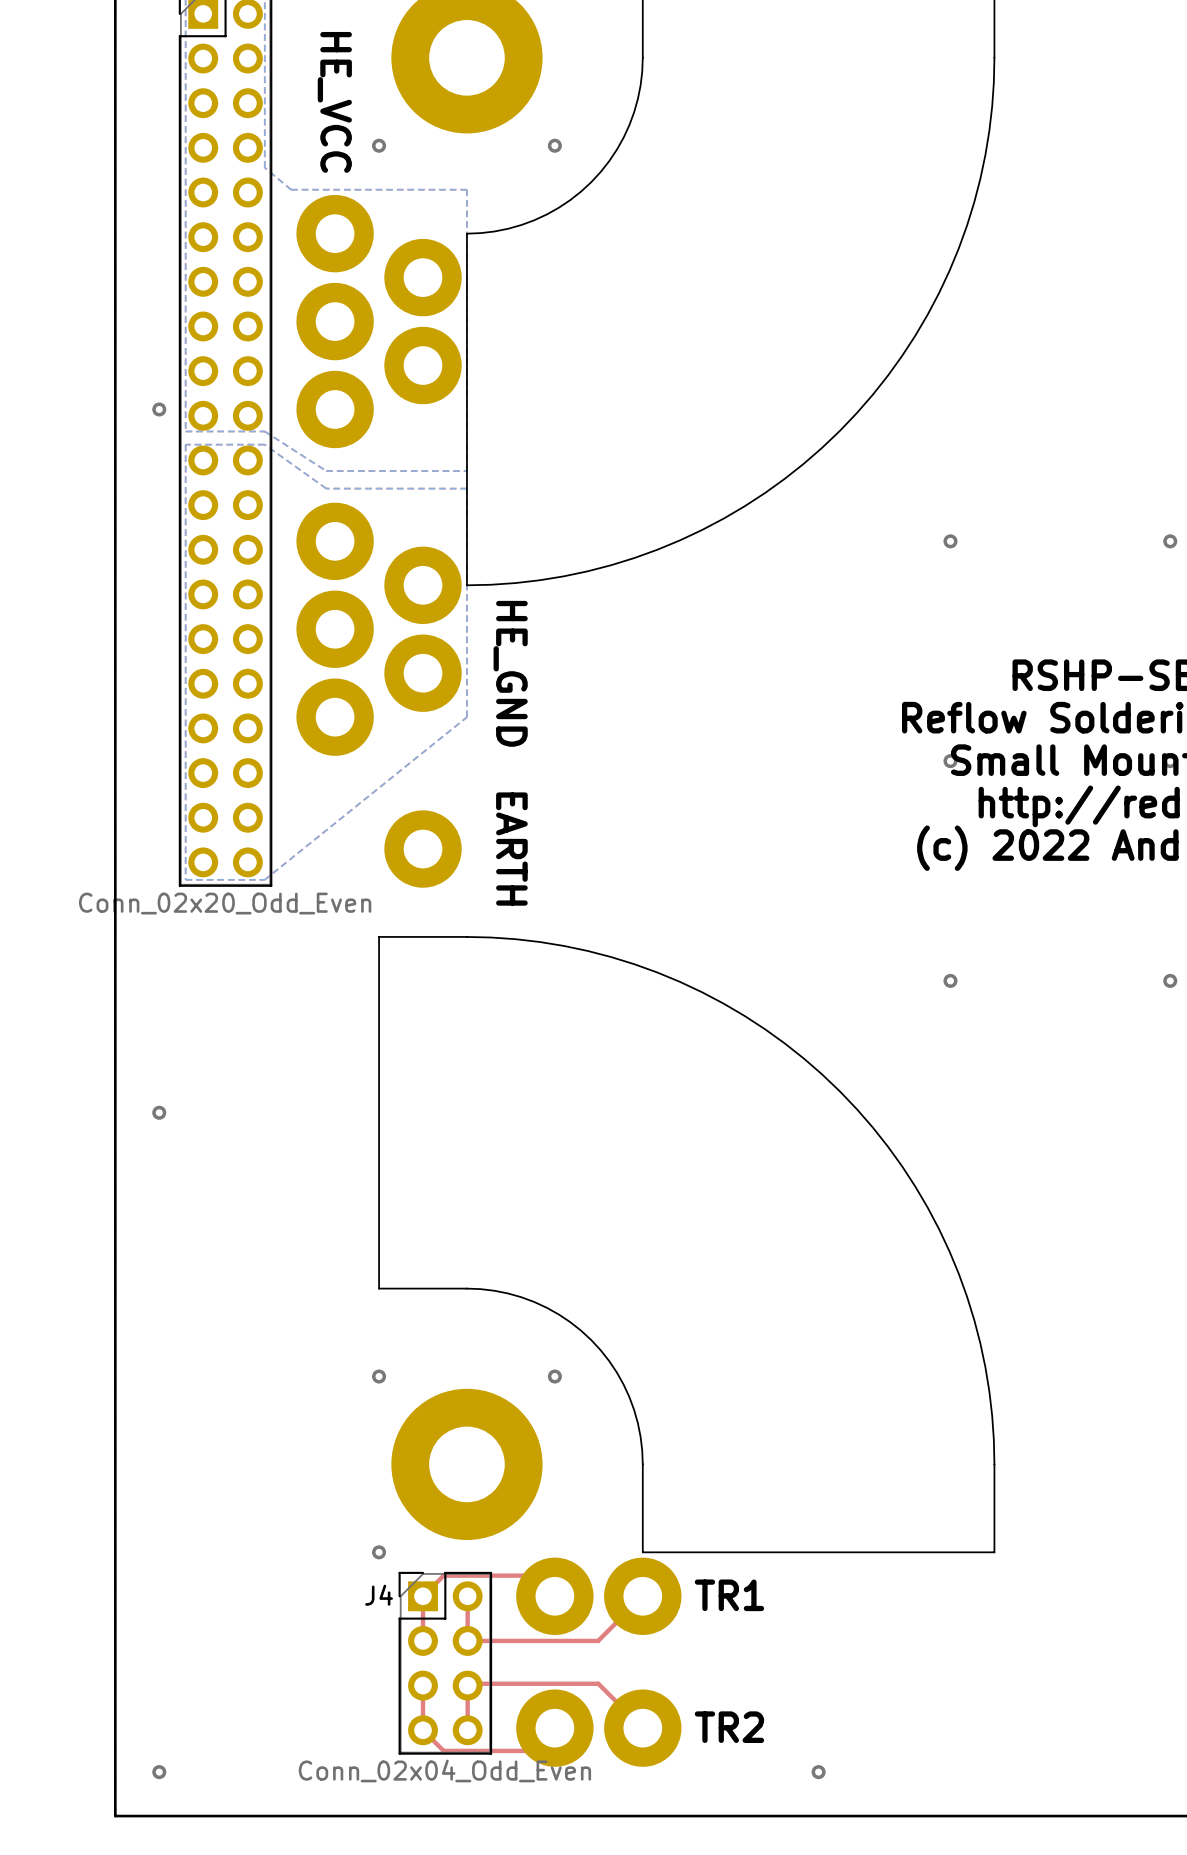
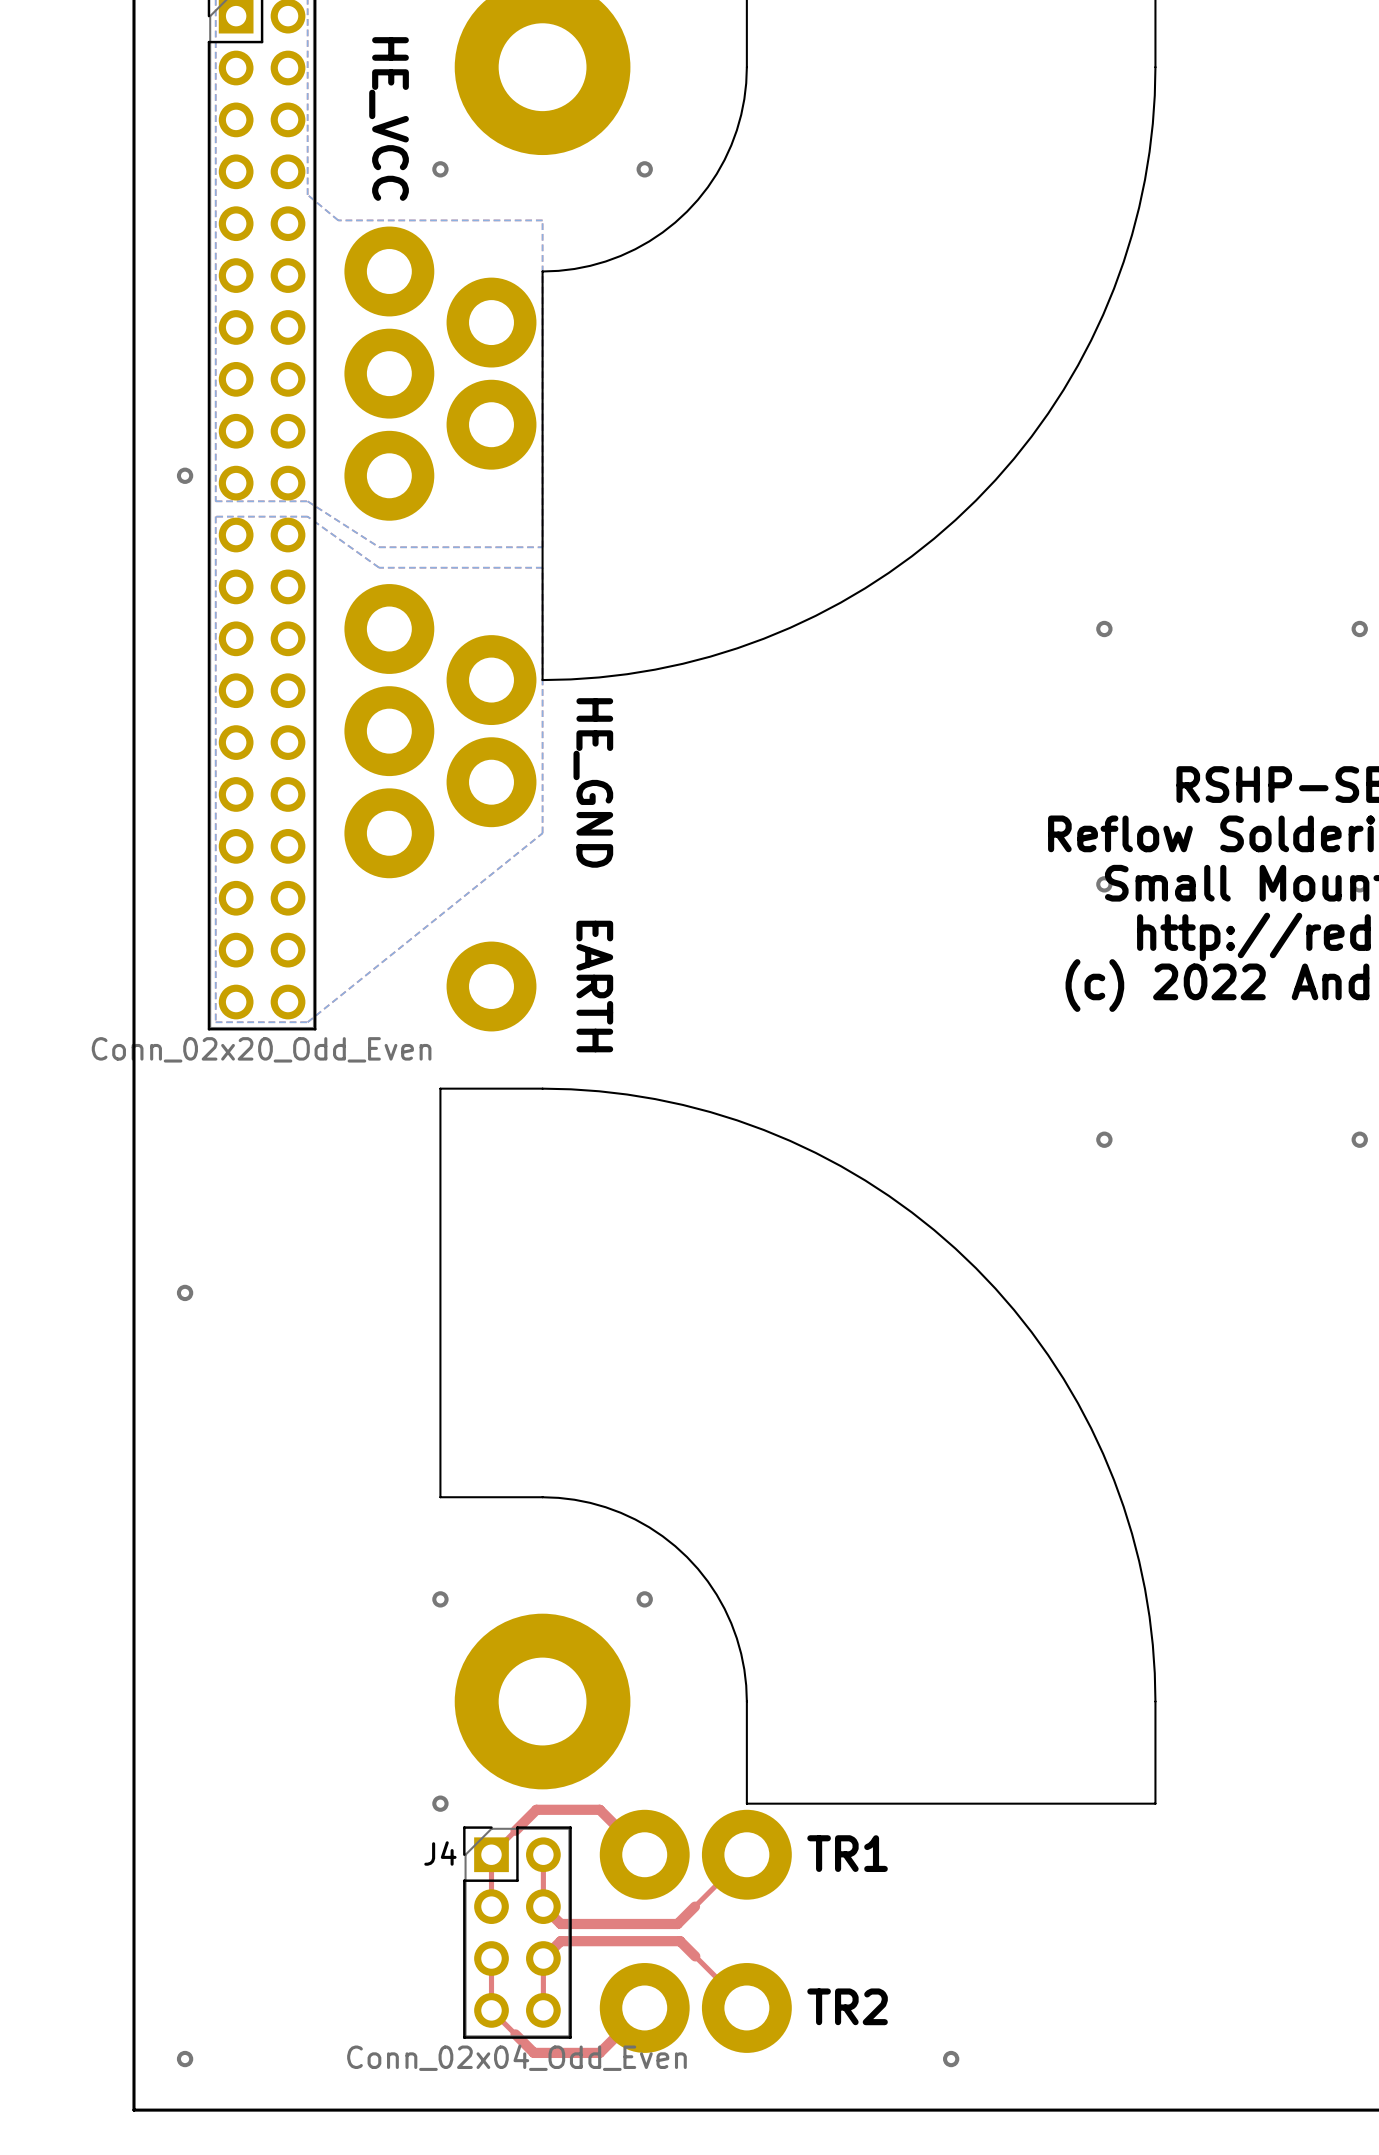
top track: (534, 1575) (443, 1575) -> (620, 1830) (599, 1809) (536, 1809) (515, 1830)
top track: (598, 1640) (467, 1640) -> (694, 1906) (677, 1924) (560, 1924) (543, 1906)
top track: (598, 1683) (469, 1683) -> (695, 1956) (680, 1941) (560, 1941) (545, 1956)
top track: (532, 1750) (443, 1750) -> (618, 2034) (599, 2052) (533, 2052) (515, 2034)

